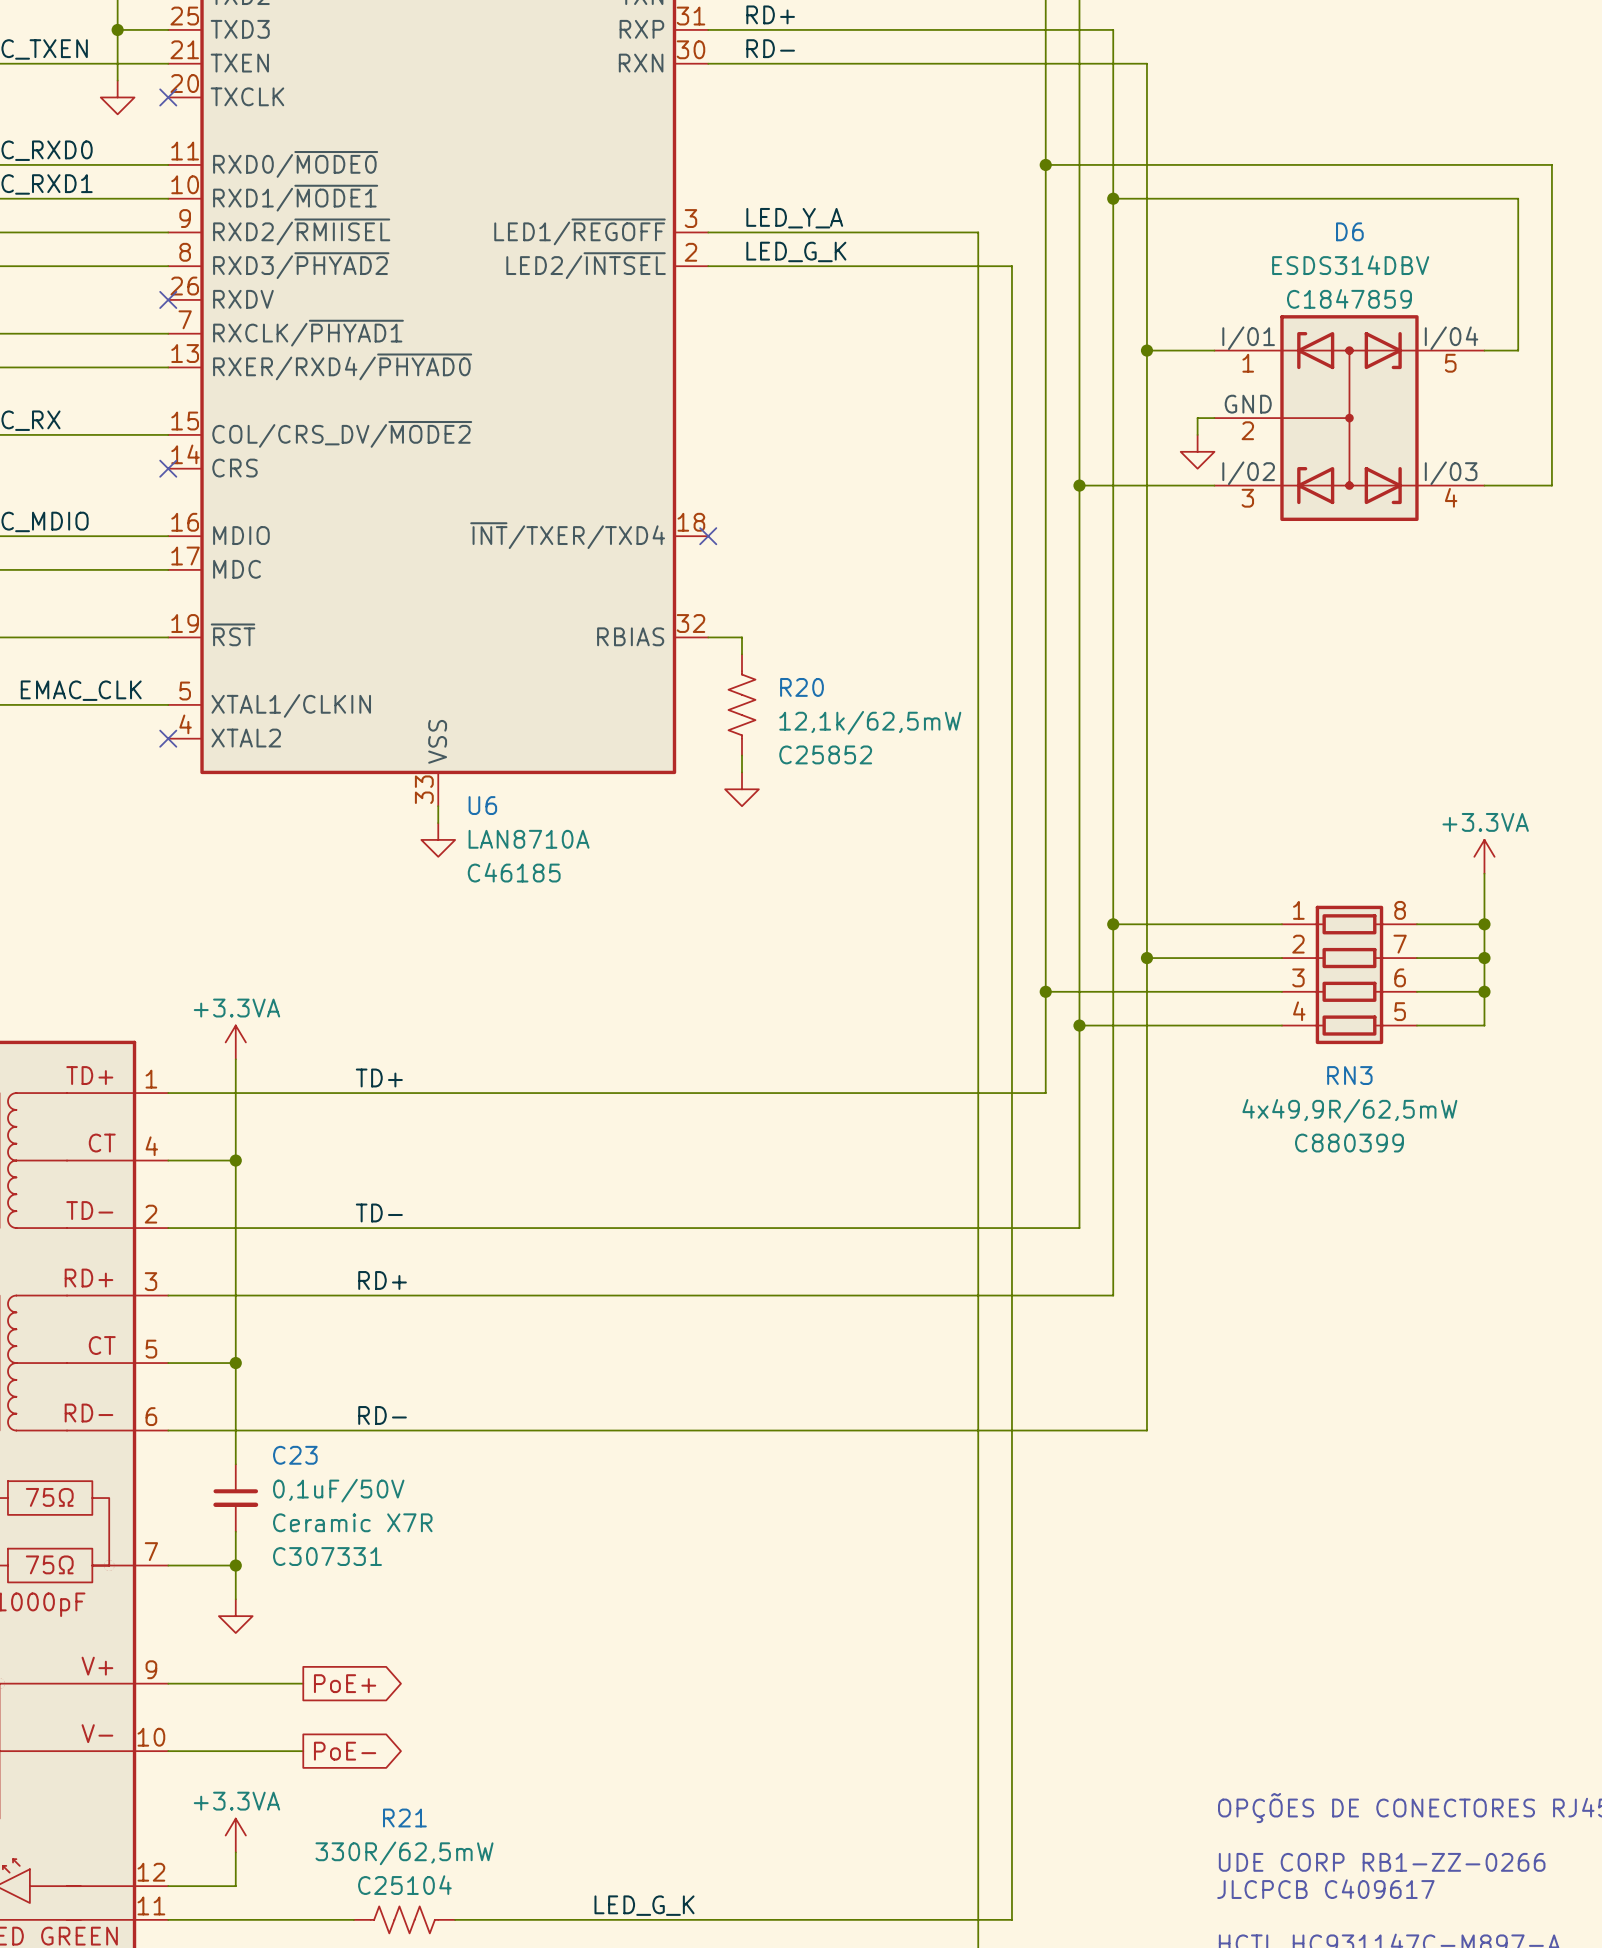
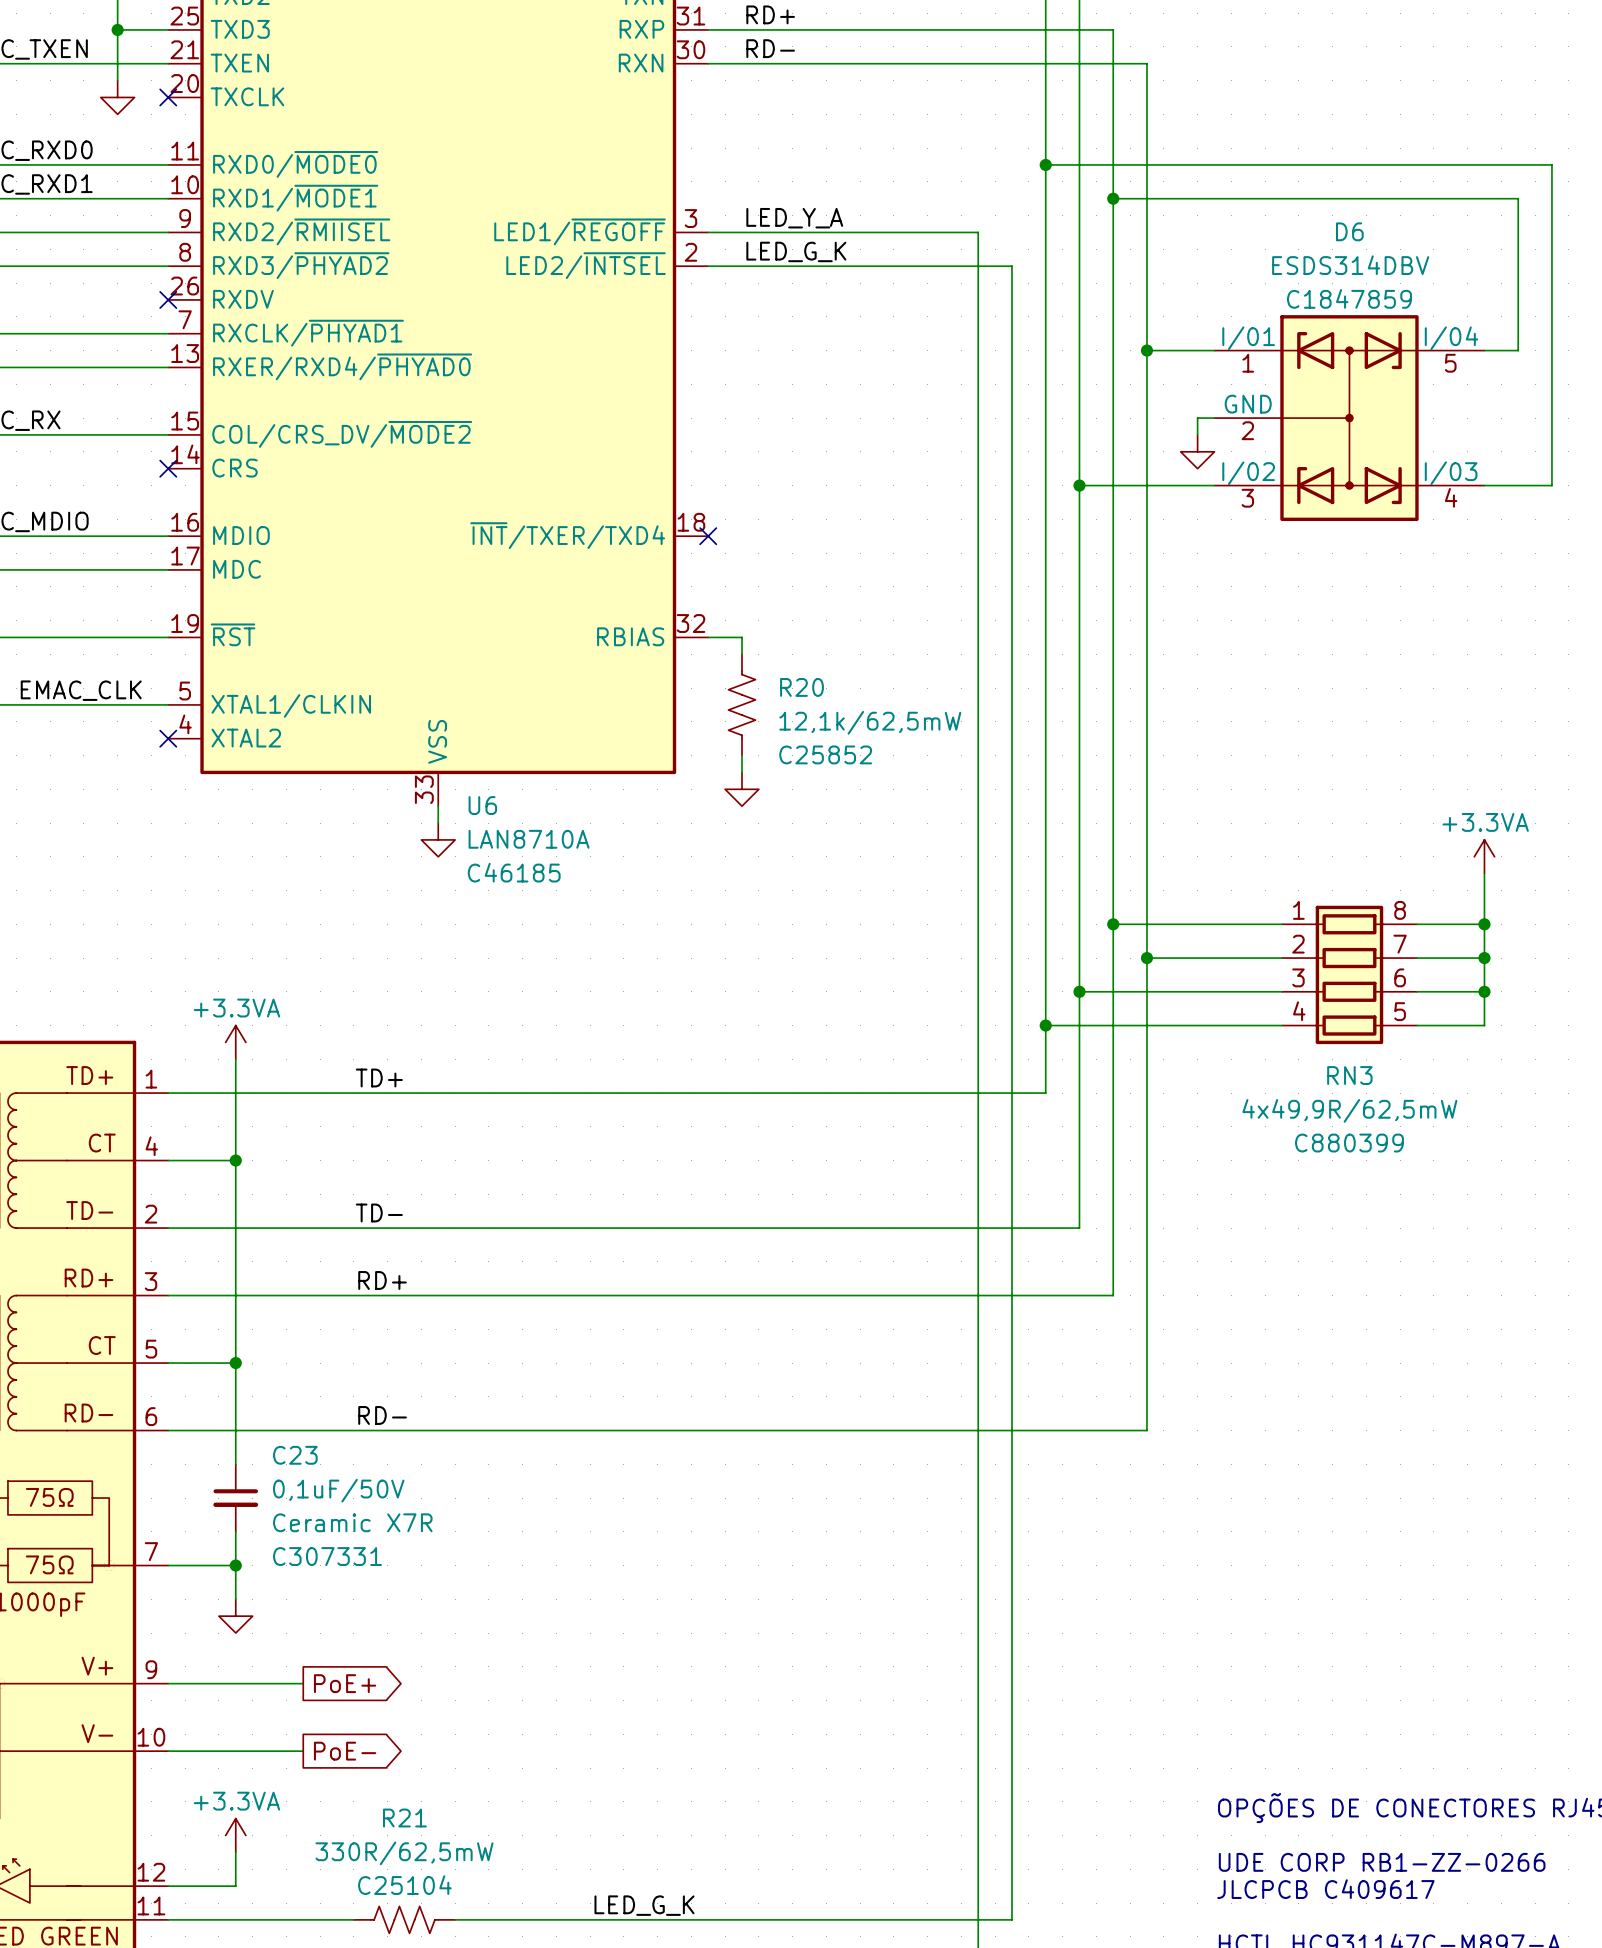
wire: (1045, 991) (1079, 991) -> (1045, 1025) (1079, 1025)
junction: (1045, 991) -> none
junction: none -> (1079, 991)
junction: none -> (1045, 1025)
junction: (1079, 1025) -> none

